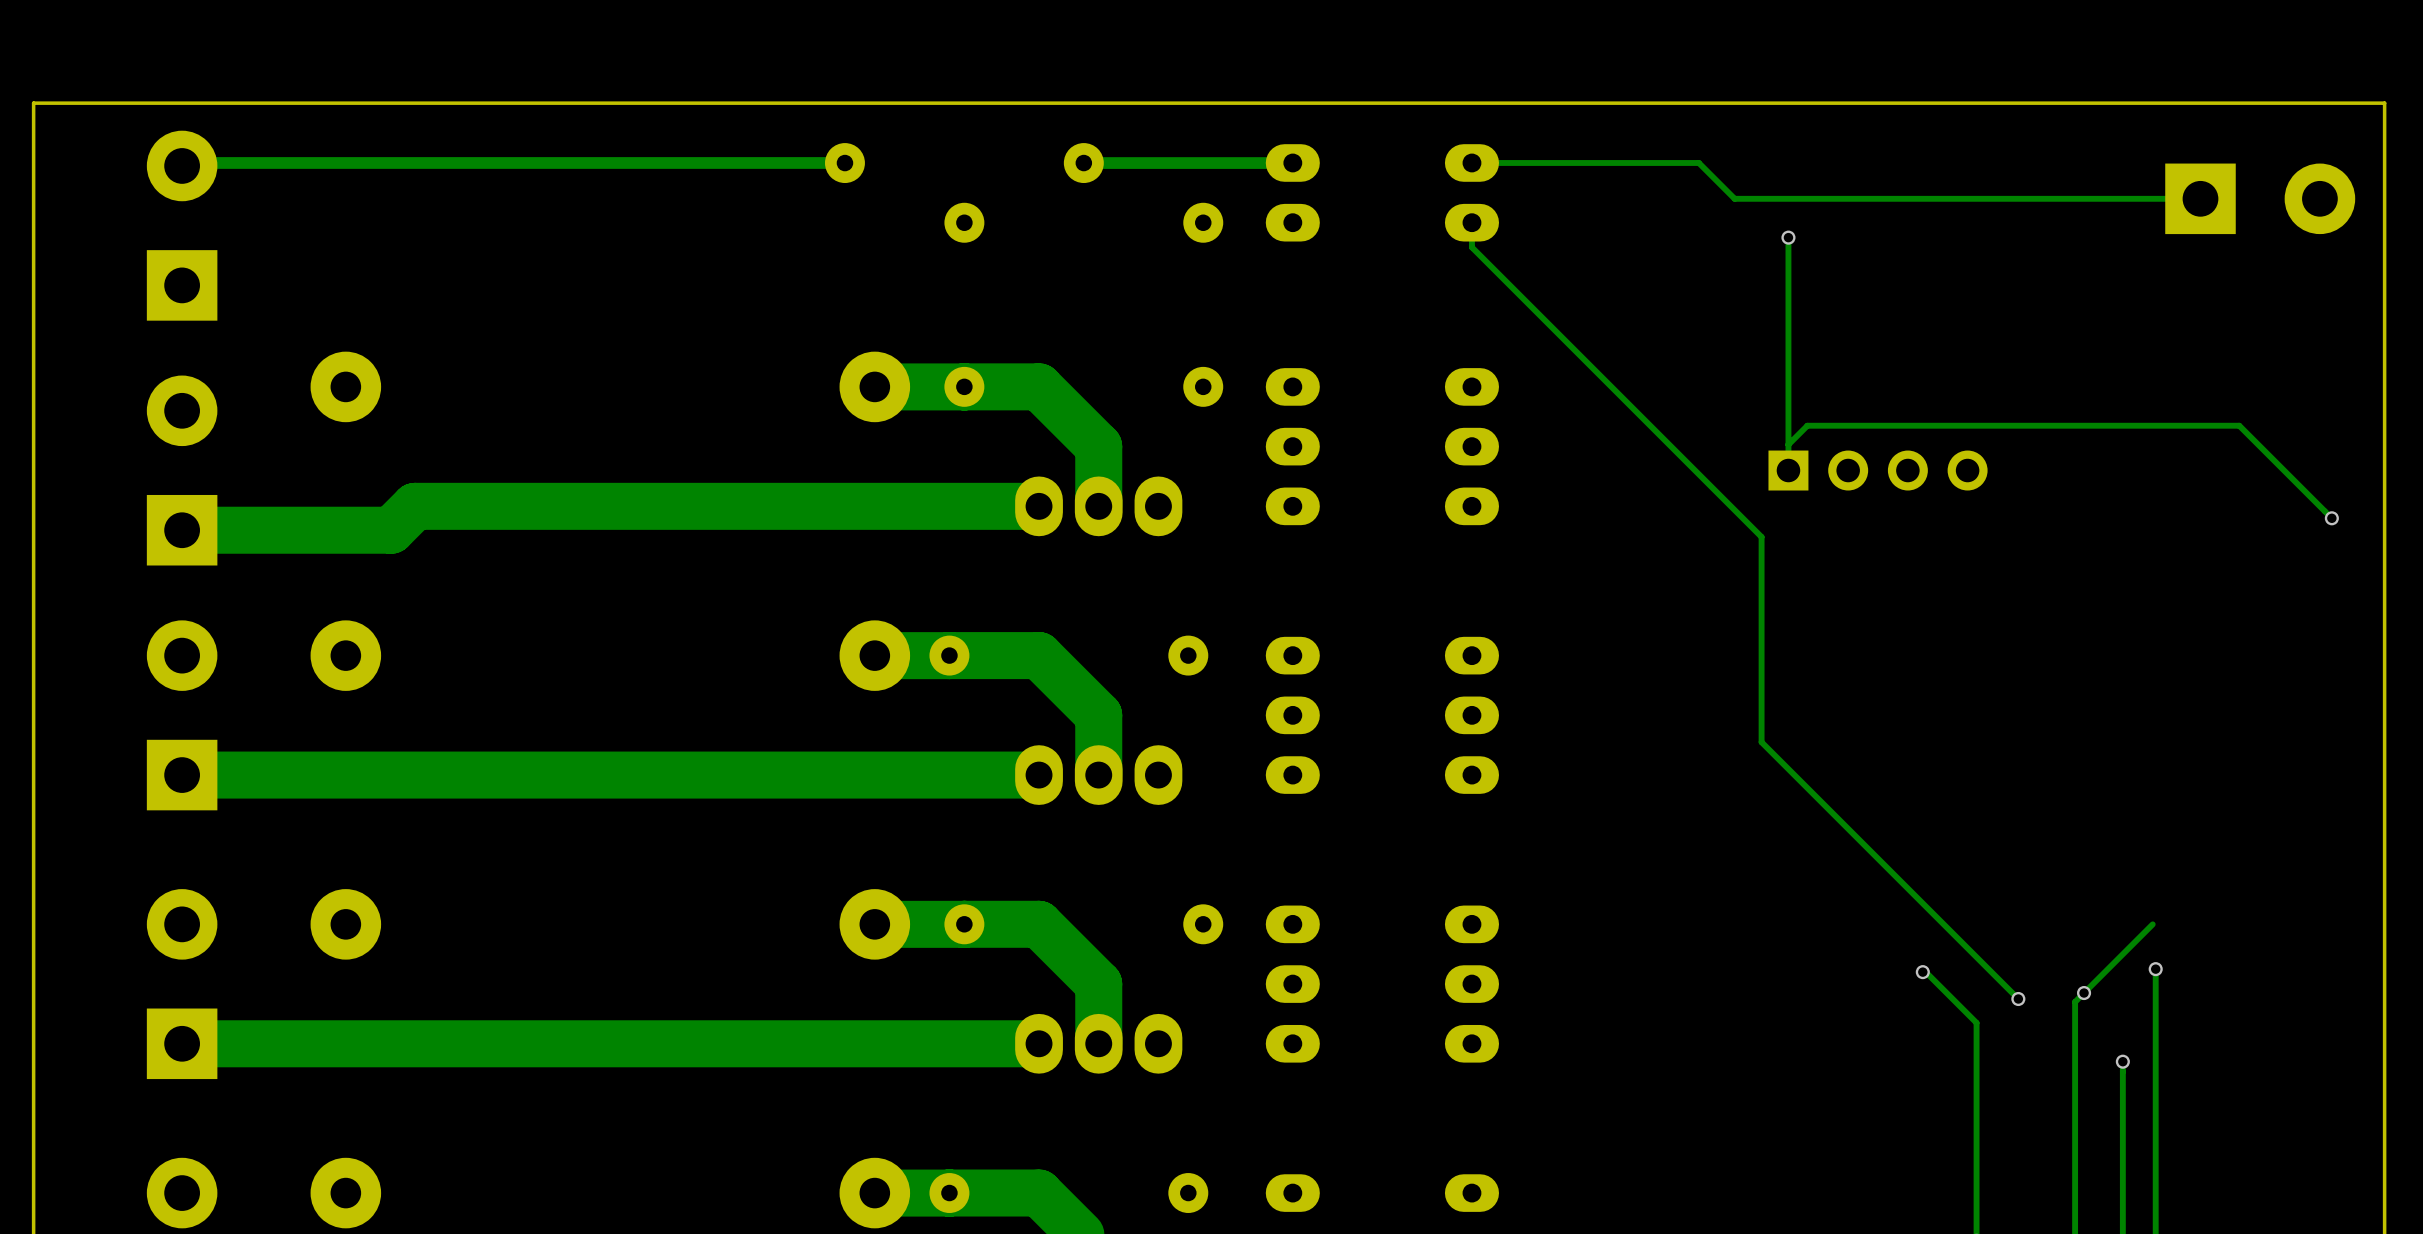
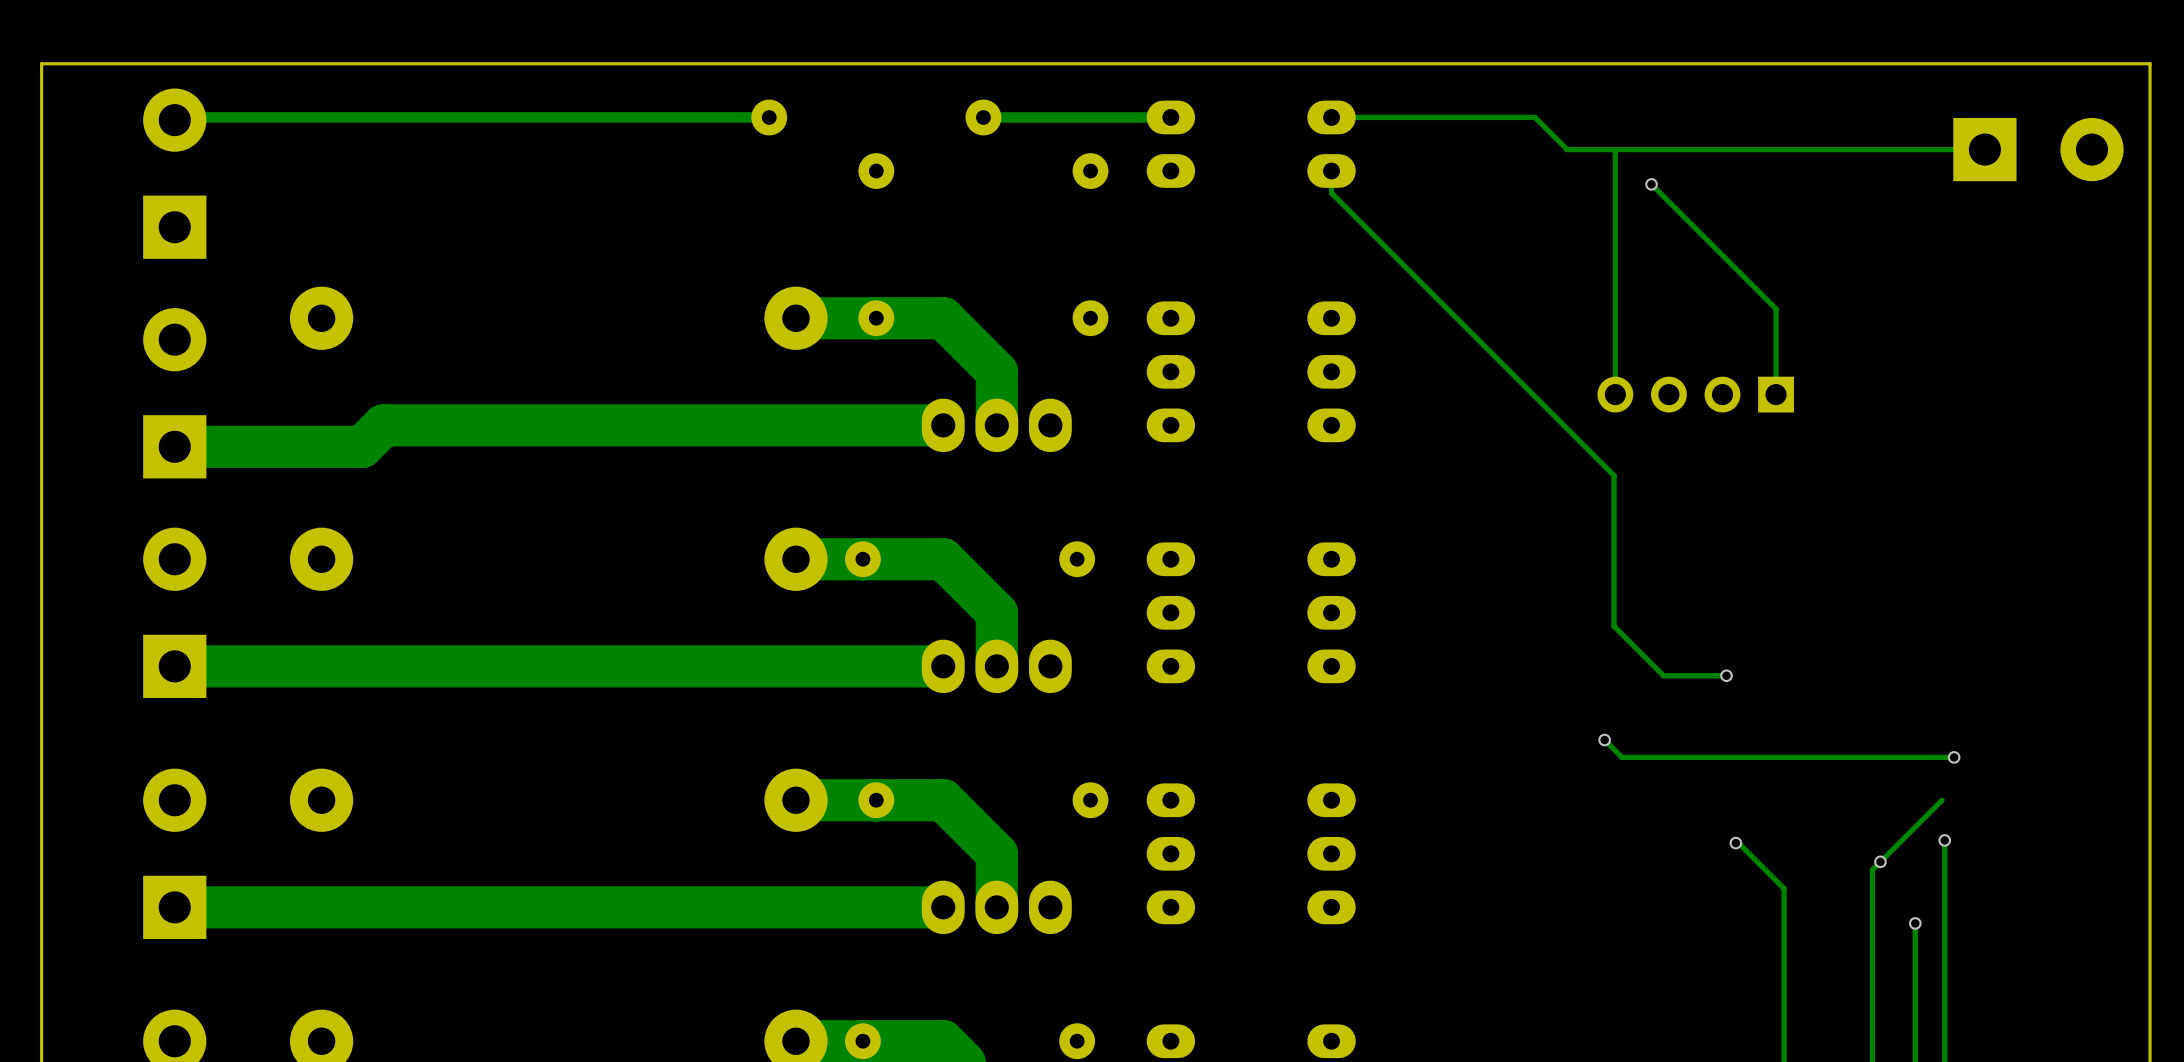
track: none -> (1615, 149) (1615, 184)
via position: (1788, 237) -> (1651, 184)
track: none -> (1651, 184) (1776, 308) (1776, 394)
track: (1788, 444) (1807, 425) (2239, 425) (2331, 518) -> none
part rotation: 0° (1878, 470) -> 180° (1695, 394)
via: (2331, 518) -> none
track: (1761, 537) (1761, 742) (2018, 999) -> (1591, 452) (1614, 475) (1614, 626) (1663, 675) (1726, 675)
via: none -> (1726, 675)
track: none -> (1604, 740) (1622, 757) (1954, 757)
via: none -> (1604, 740)
via: none -> (1954, 757)
via: (2018, 999) -> none

